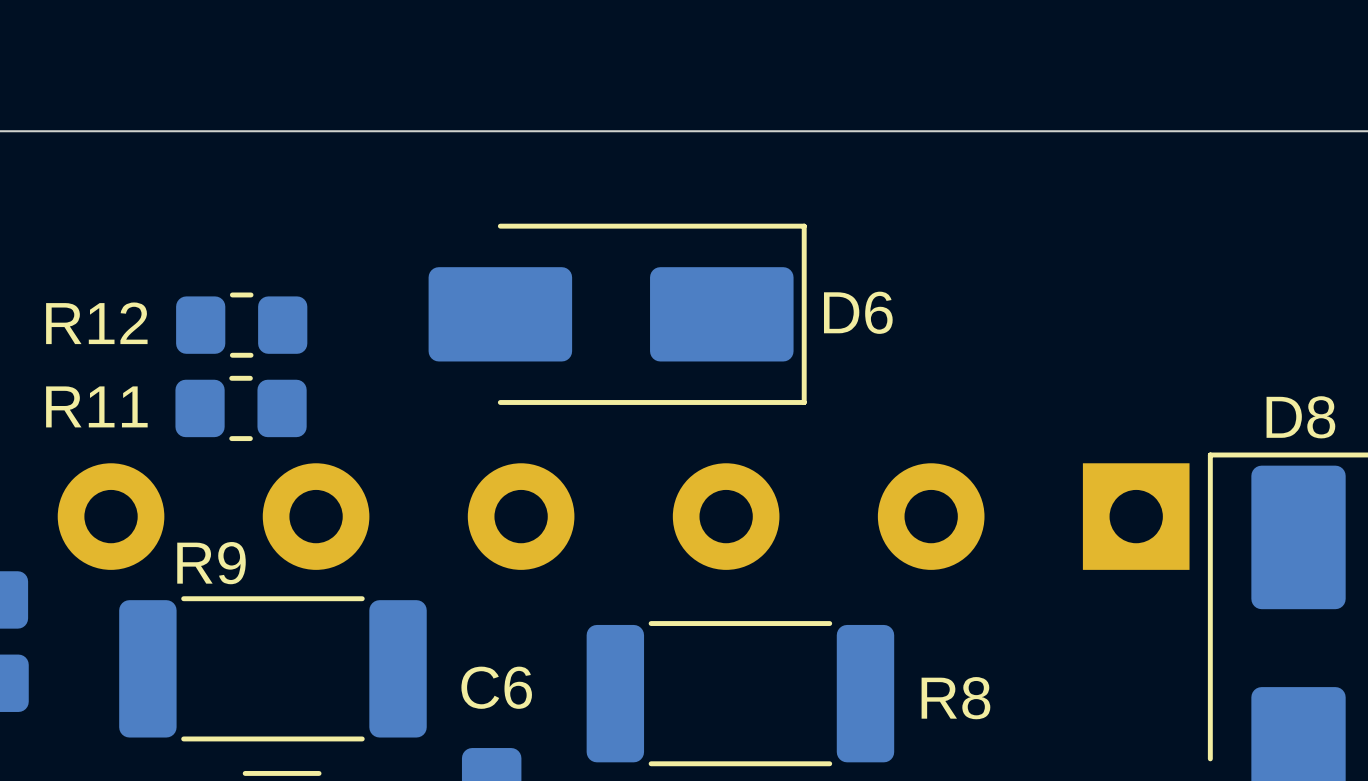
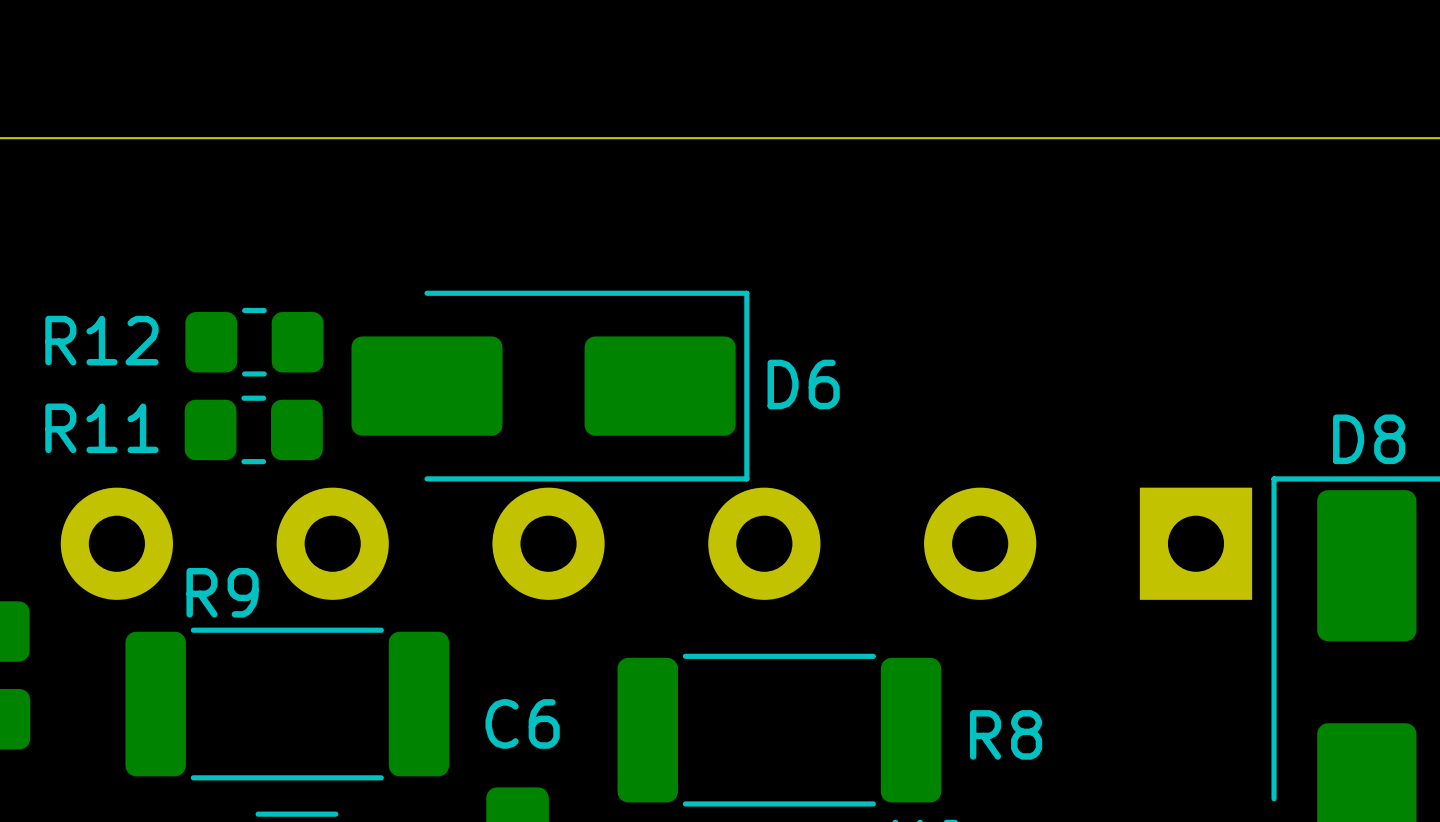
D6 position: (617, 314) -> (550, 386)

